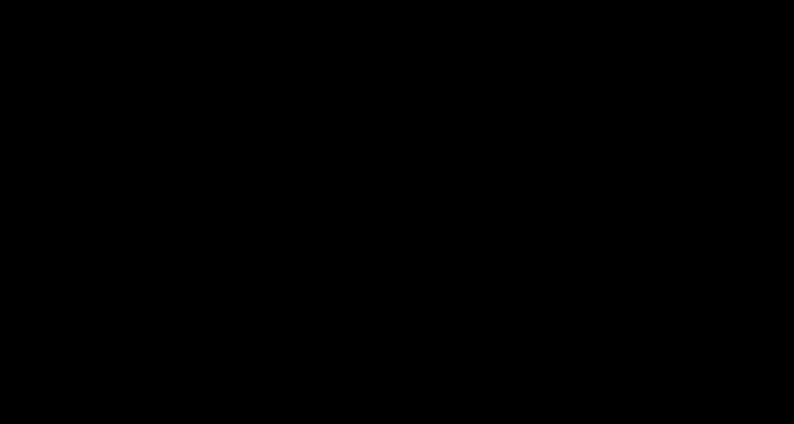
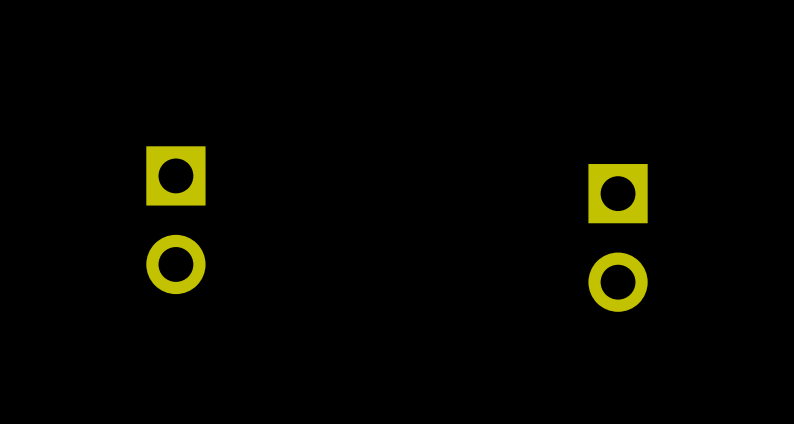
part: none -> (175, 220)
part: none -> (618, 237)

